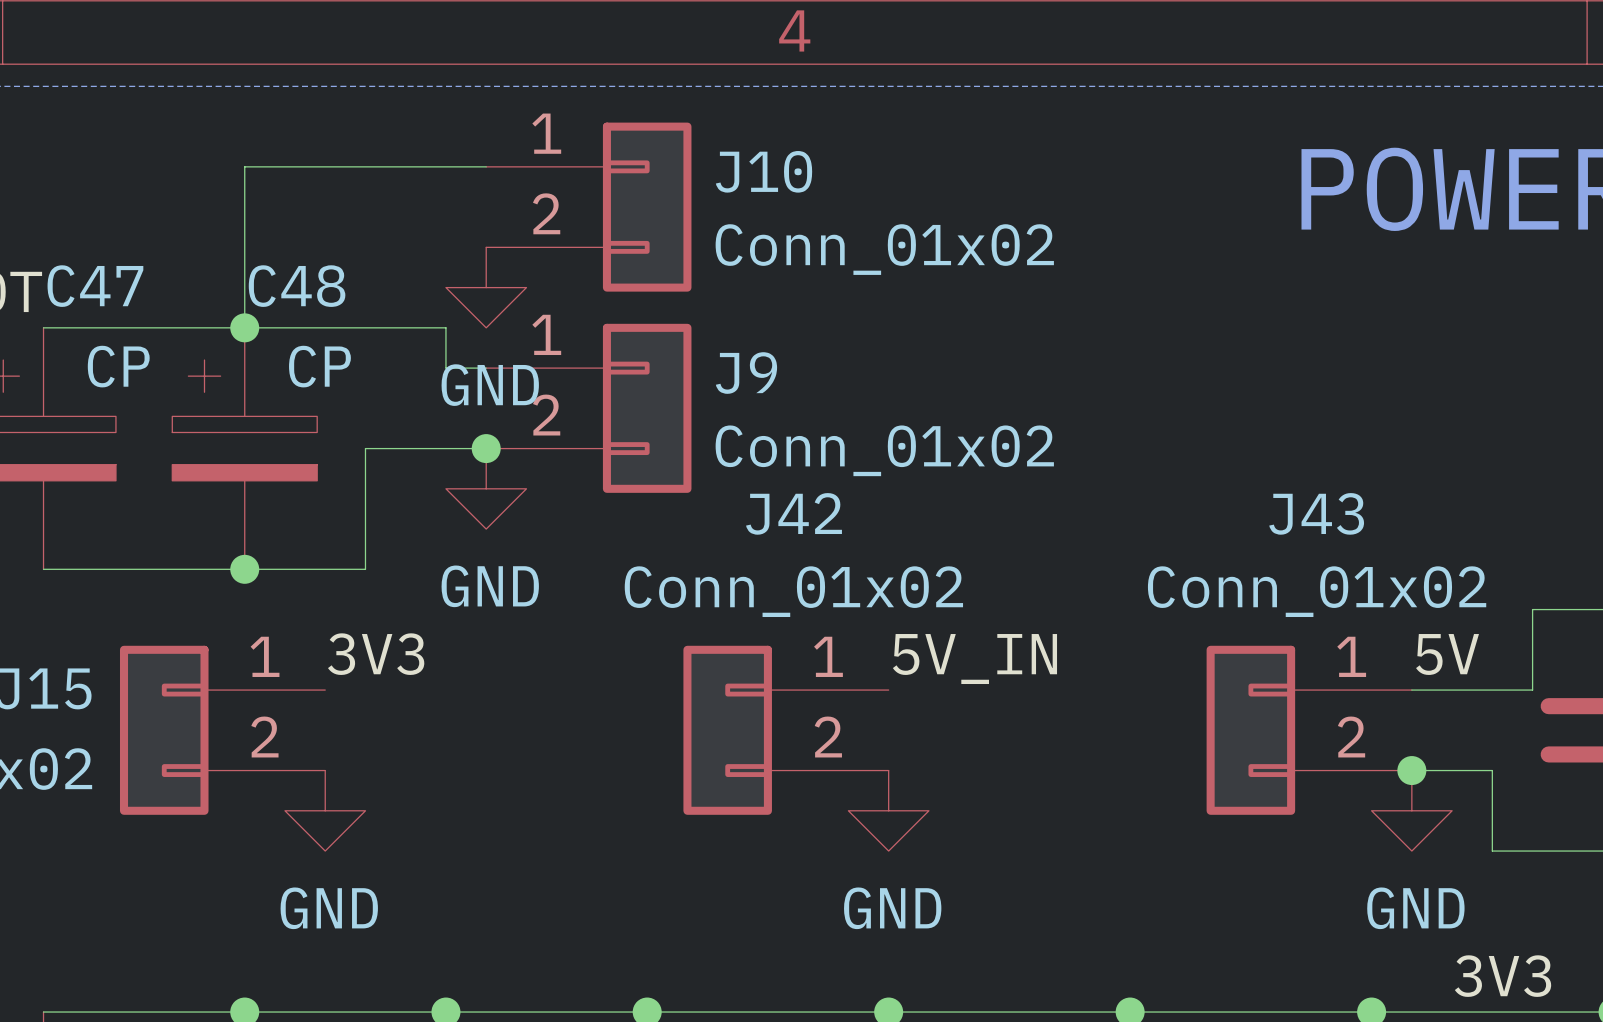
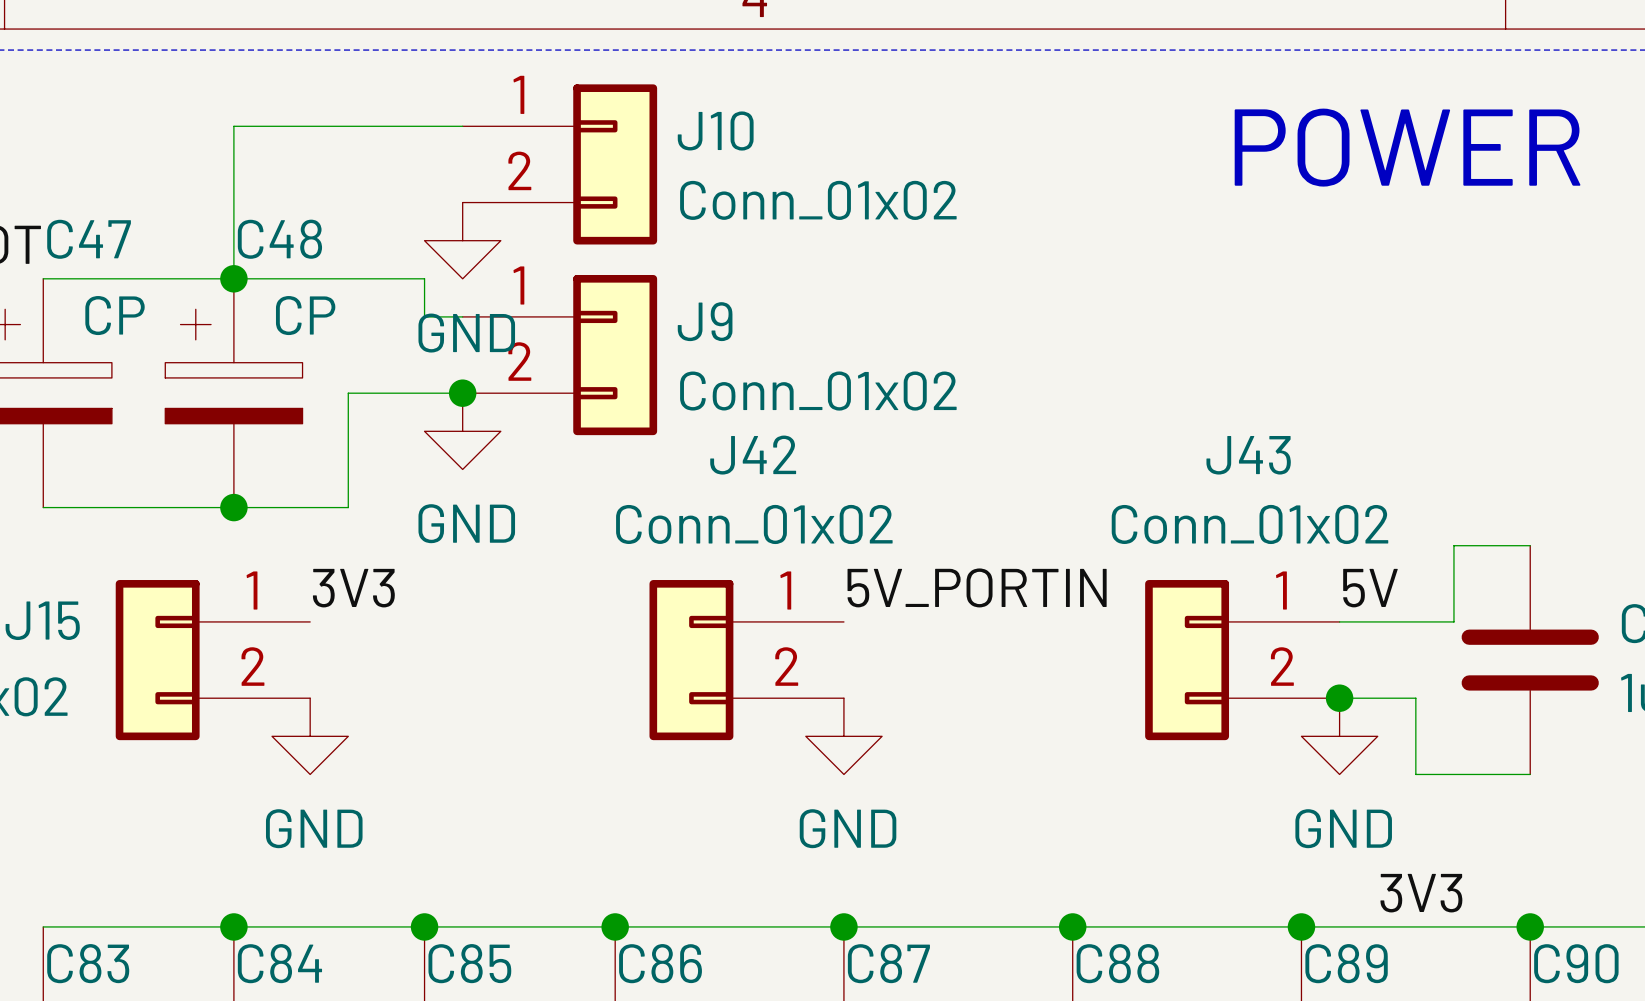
label: 5V_IN (974, 659) -> 5V_PORTIN (977, 587)

